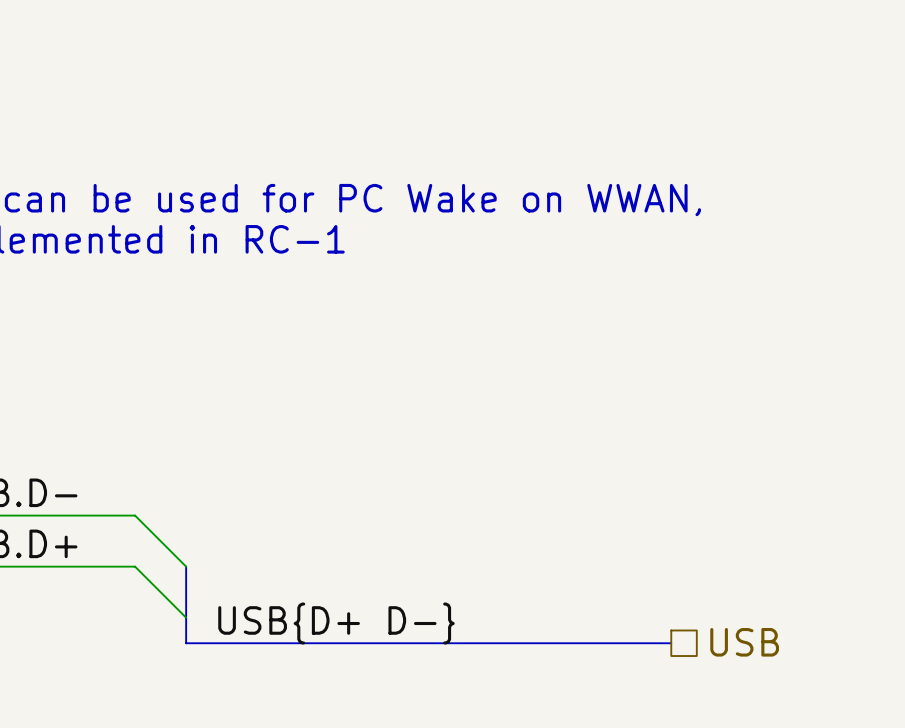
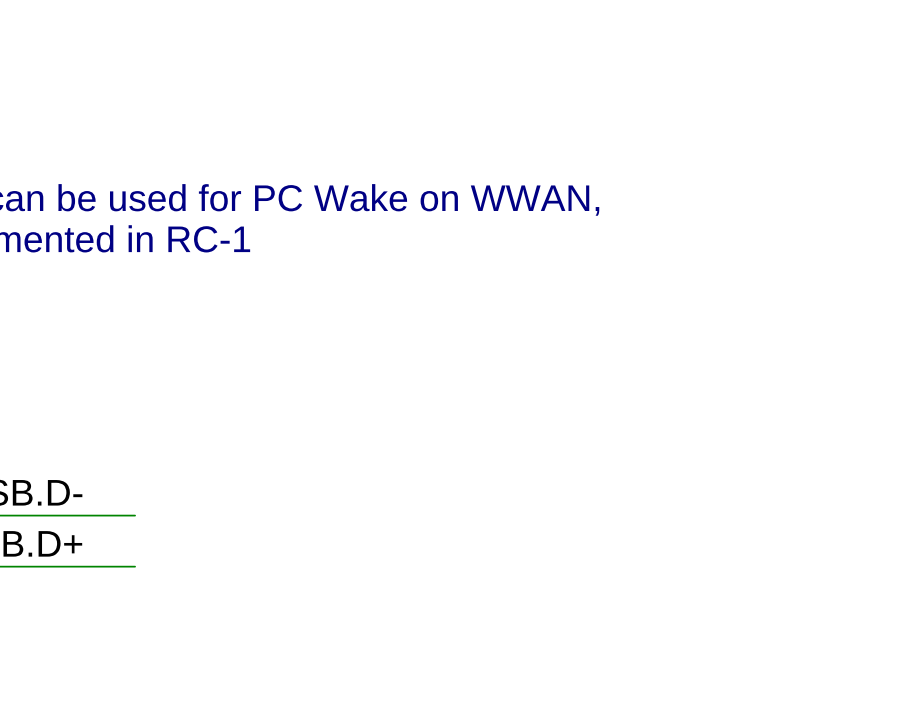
wire: (135, 515) (186, 566) -> none
wire: (135, 566) (186, 617) -> none
bus: (186, 566) (186, 643) (671, 643) -> none
label: USB{D+ D-} (336, 623) -> none
hierarchical label: USB (744, 642) -> none

